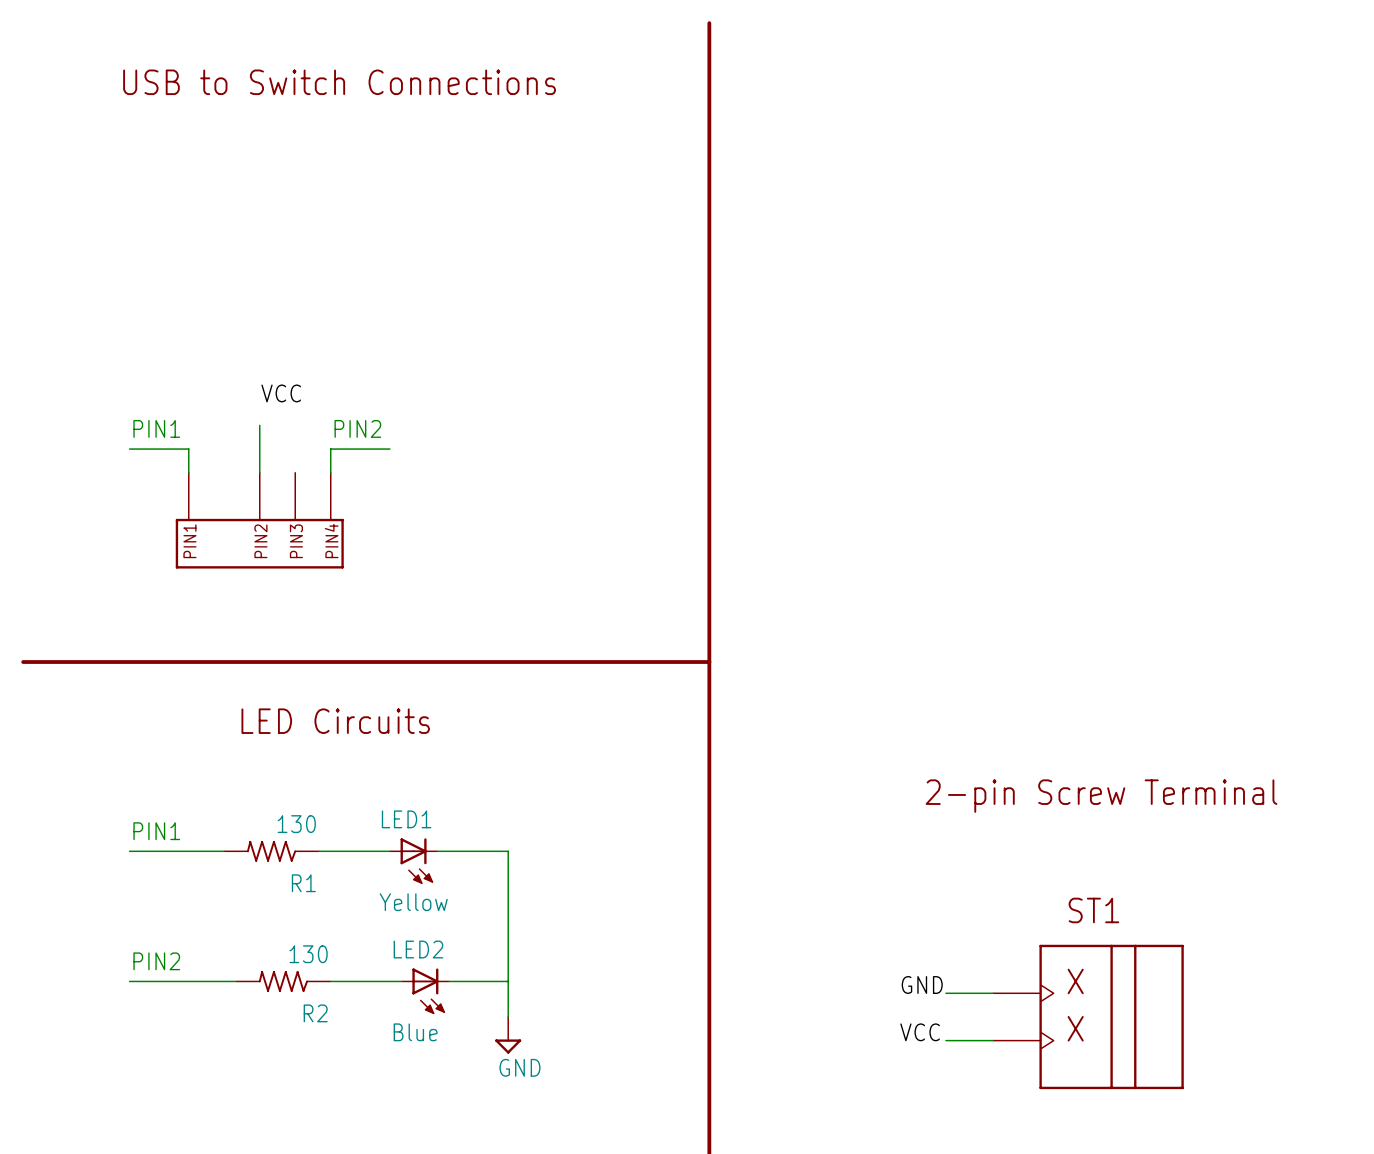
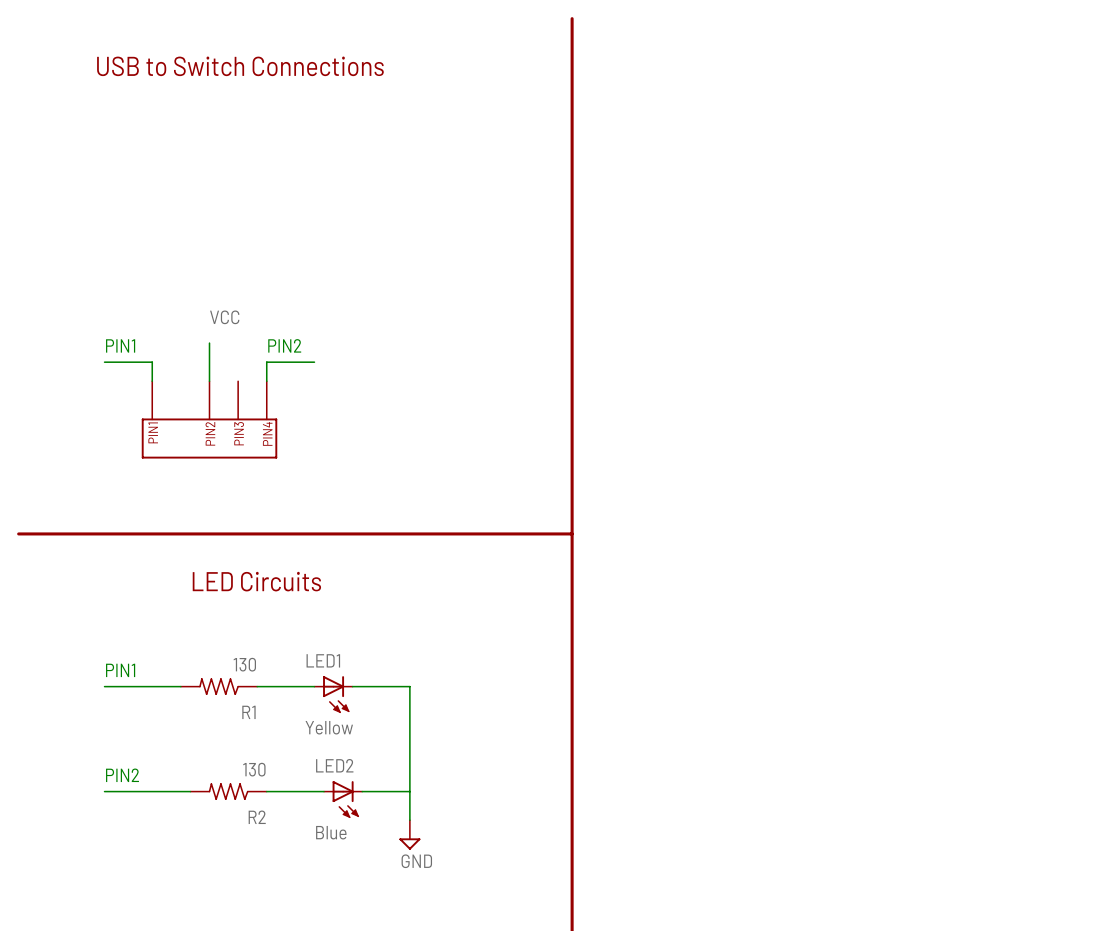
text: 2-pin Screw Terminal (1101, 796) -> none
label: GND (922, 985) -> none
wire: (945, 993) (993, 993) -> none
ST1: (1088, 1016) -> none
label: VCC (920, 1032) -> none
wire: (945, 1040) (993, 1040) -> none

